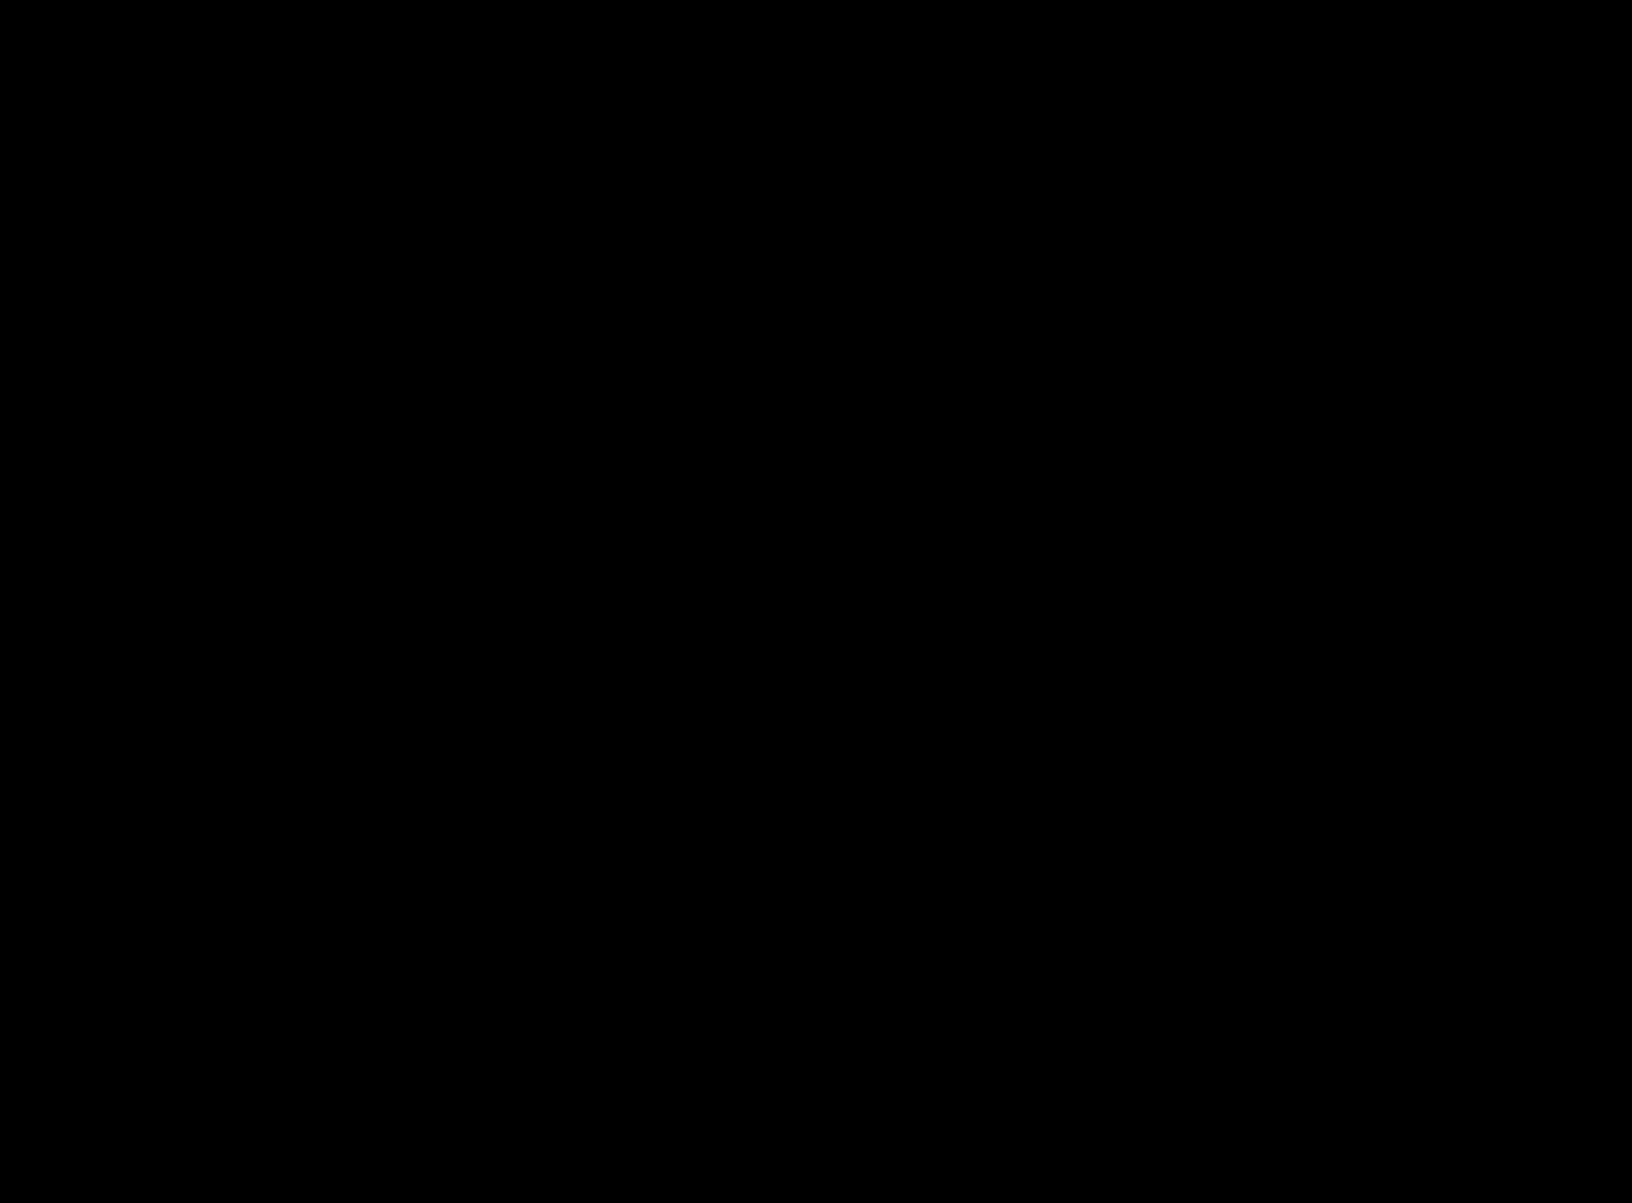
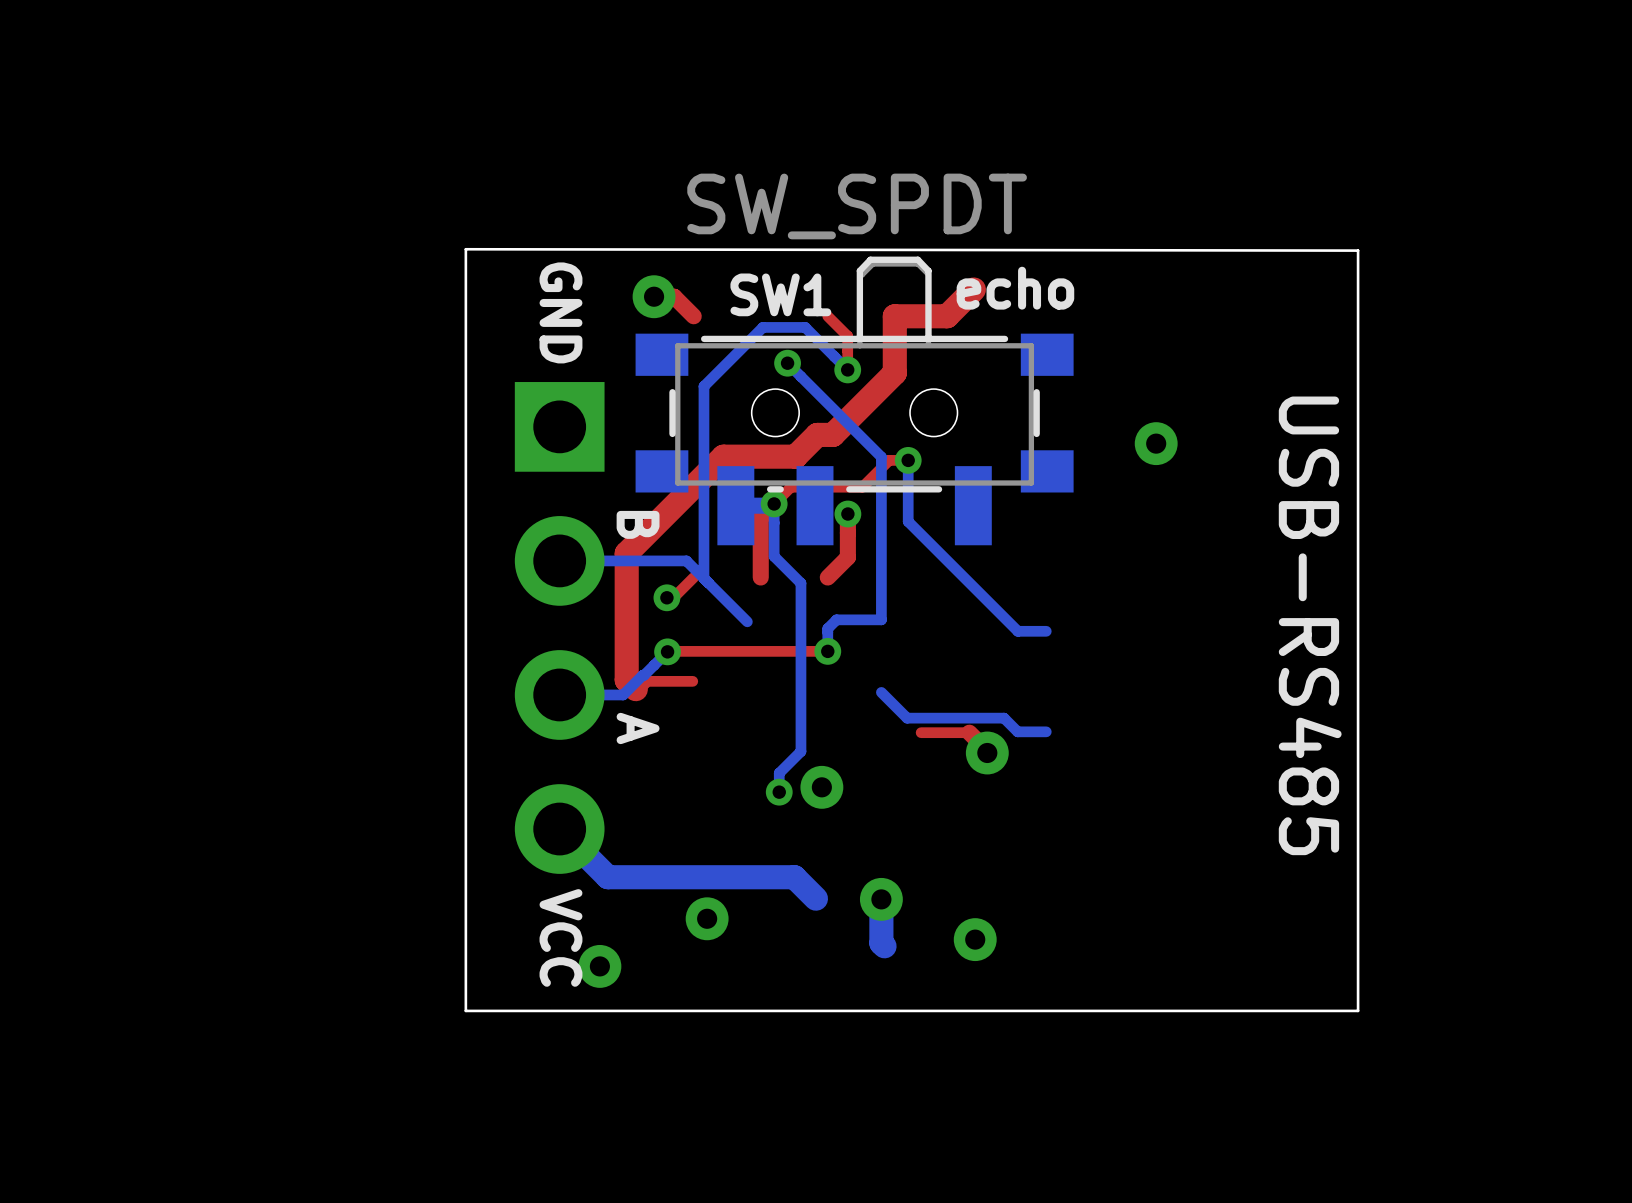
board edge: none -> (465, 249) (465, 1010) (1358, 1010) (1358, 250) (465, 249)
text: none -> echo (1015, 288)
top track: none -> (973, 289) (947, 316) (894, 316) (894, 373) (832, 434) (817, 434) (795, 456) (723, 456) (626, 553) (626, 680) (635, 689) (643, 681) (692, 681)
top track: none -> (654, 296) (674, 296) (693, 316)
via: none -> (654, 296)
text: none -> GND (560, 312)
top track: none -> (827, 316) (847, 336) (847, 369)
bottom track: none -> (787, 363) (881, 457) (881, 619) (836, 619) (827, 628) (827, 651)
via: none -> (787, 363)
bottom track: none -> (847, 369) (805, 327) (762, 327) (703, 386) (703, 578)
via: none -> (847, 369)
SW1: none -> SW_SPDT (854, 400)
via: none -> (1156, 443)
top track: none -> (908, 460) (889, 460) (862, 487) (790, 487) (760, 517) (760, 577)
bottom track: none -> (908, 460) (908, 521) (1017, 631) (1046, 631)
via: none -> (908, 460)
via: none -> (774, 503)
bottom track: none -> (735, 505) (772, 505) (774, 503) (774, 556) (800, 583) (800, 751) (779, 773) (779, 792)
top track: none -> (847, 514) (847, 557) (827, 577)
via: none -> (847, 514)
text: none -> B (638, 524)
bottom track: none -> (559, 560) (686, 560) (747, 621)
top track: none -> (693, 577) (673, 597) (666, 597)
via: none -> (666, 597)
text: none -> USB-RS485 (1310, 625)
part: none -> (559, 627)
bottom track: none -> (667, 651) (623, 694) (559, 694)
via: none -> (667, 651)
top track: none -> (827, 651) (668, 651)
via: none -> (827, 651)
bottom track: none -> (881, 692) (907, 718) (1004, 718) (1017, 731) (1046, 731)
text: none -> A (638, 728)
top track: none -> (921, 732) (969, 732) (987, 750) (987, 752)
via: none -> (987, 752)
via: none -> (821, 787)
via: none -> (779, 792)
bottom track: none -> (559, 829) (607, 877) (794, 877) (815, 898)
bottom track: none -> (881, 899) (881, 943) (884, 946)
via: none -> (881, 899)
via: none -> (707, 918)
text: none -> VCC (560, 937)
via: none -> (975, 939)
via: none -> (599, 966)

